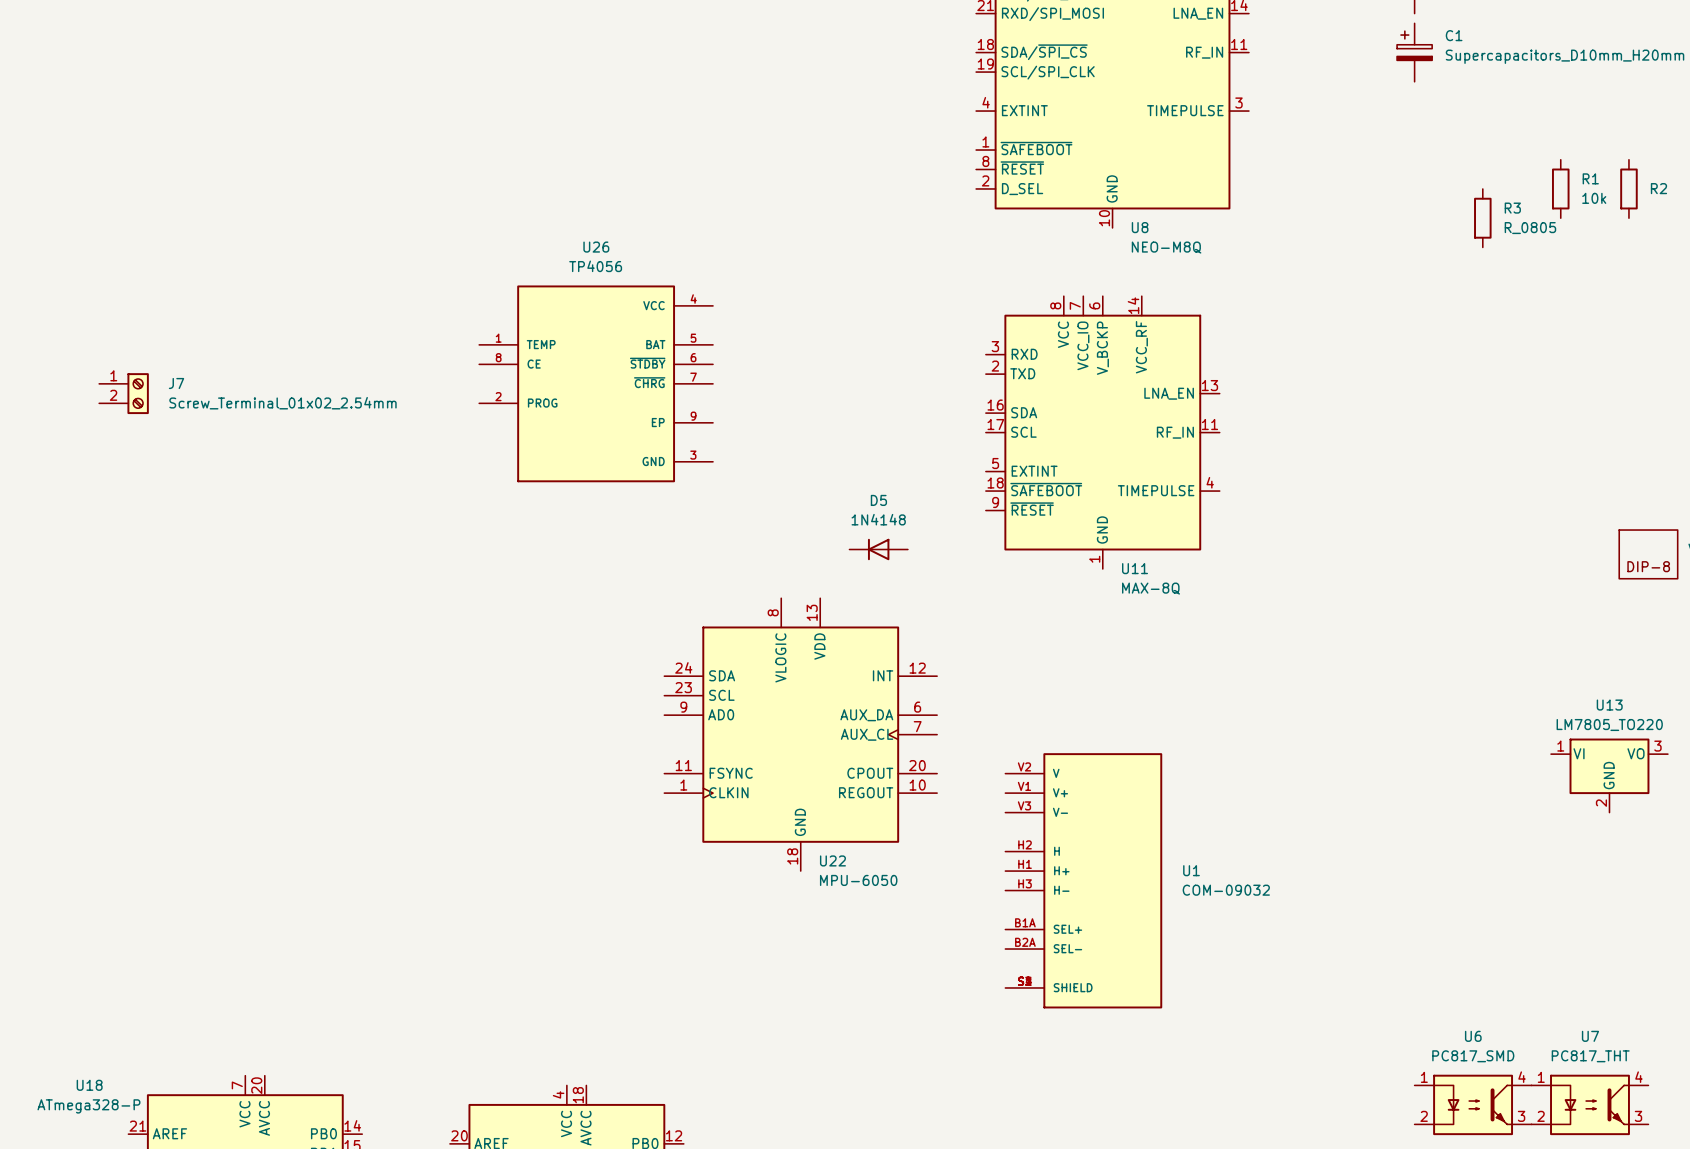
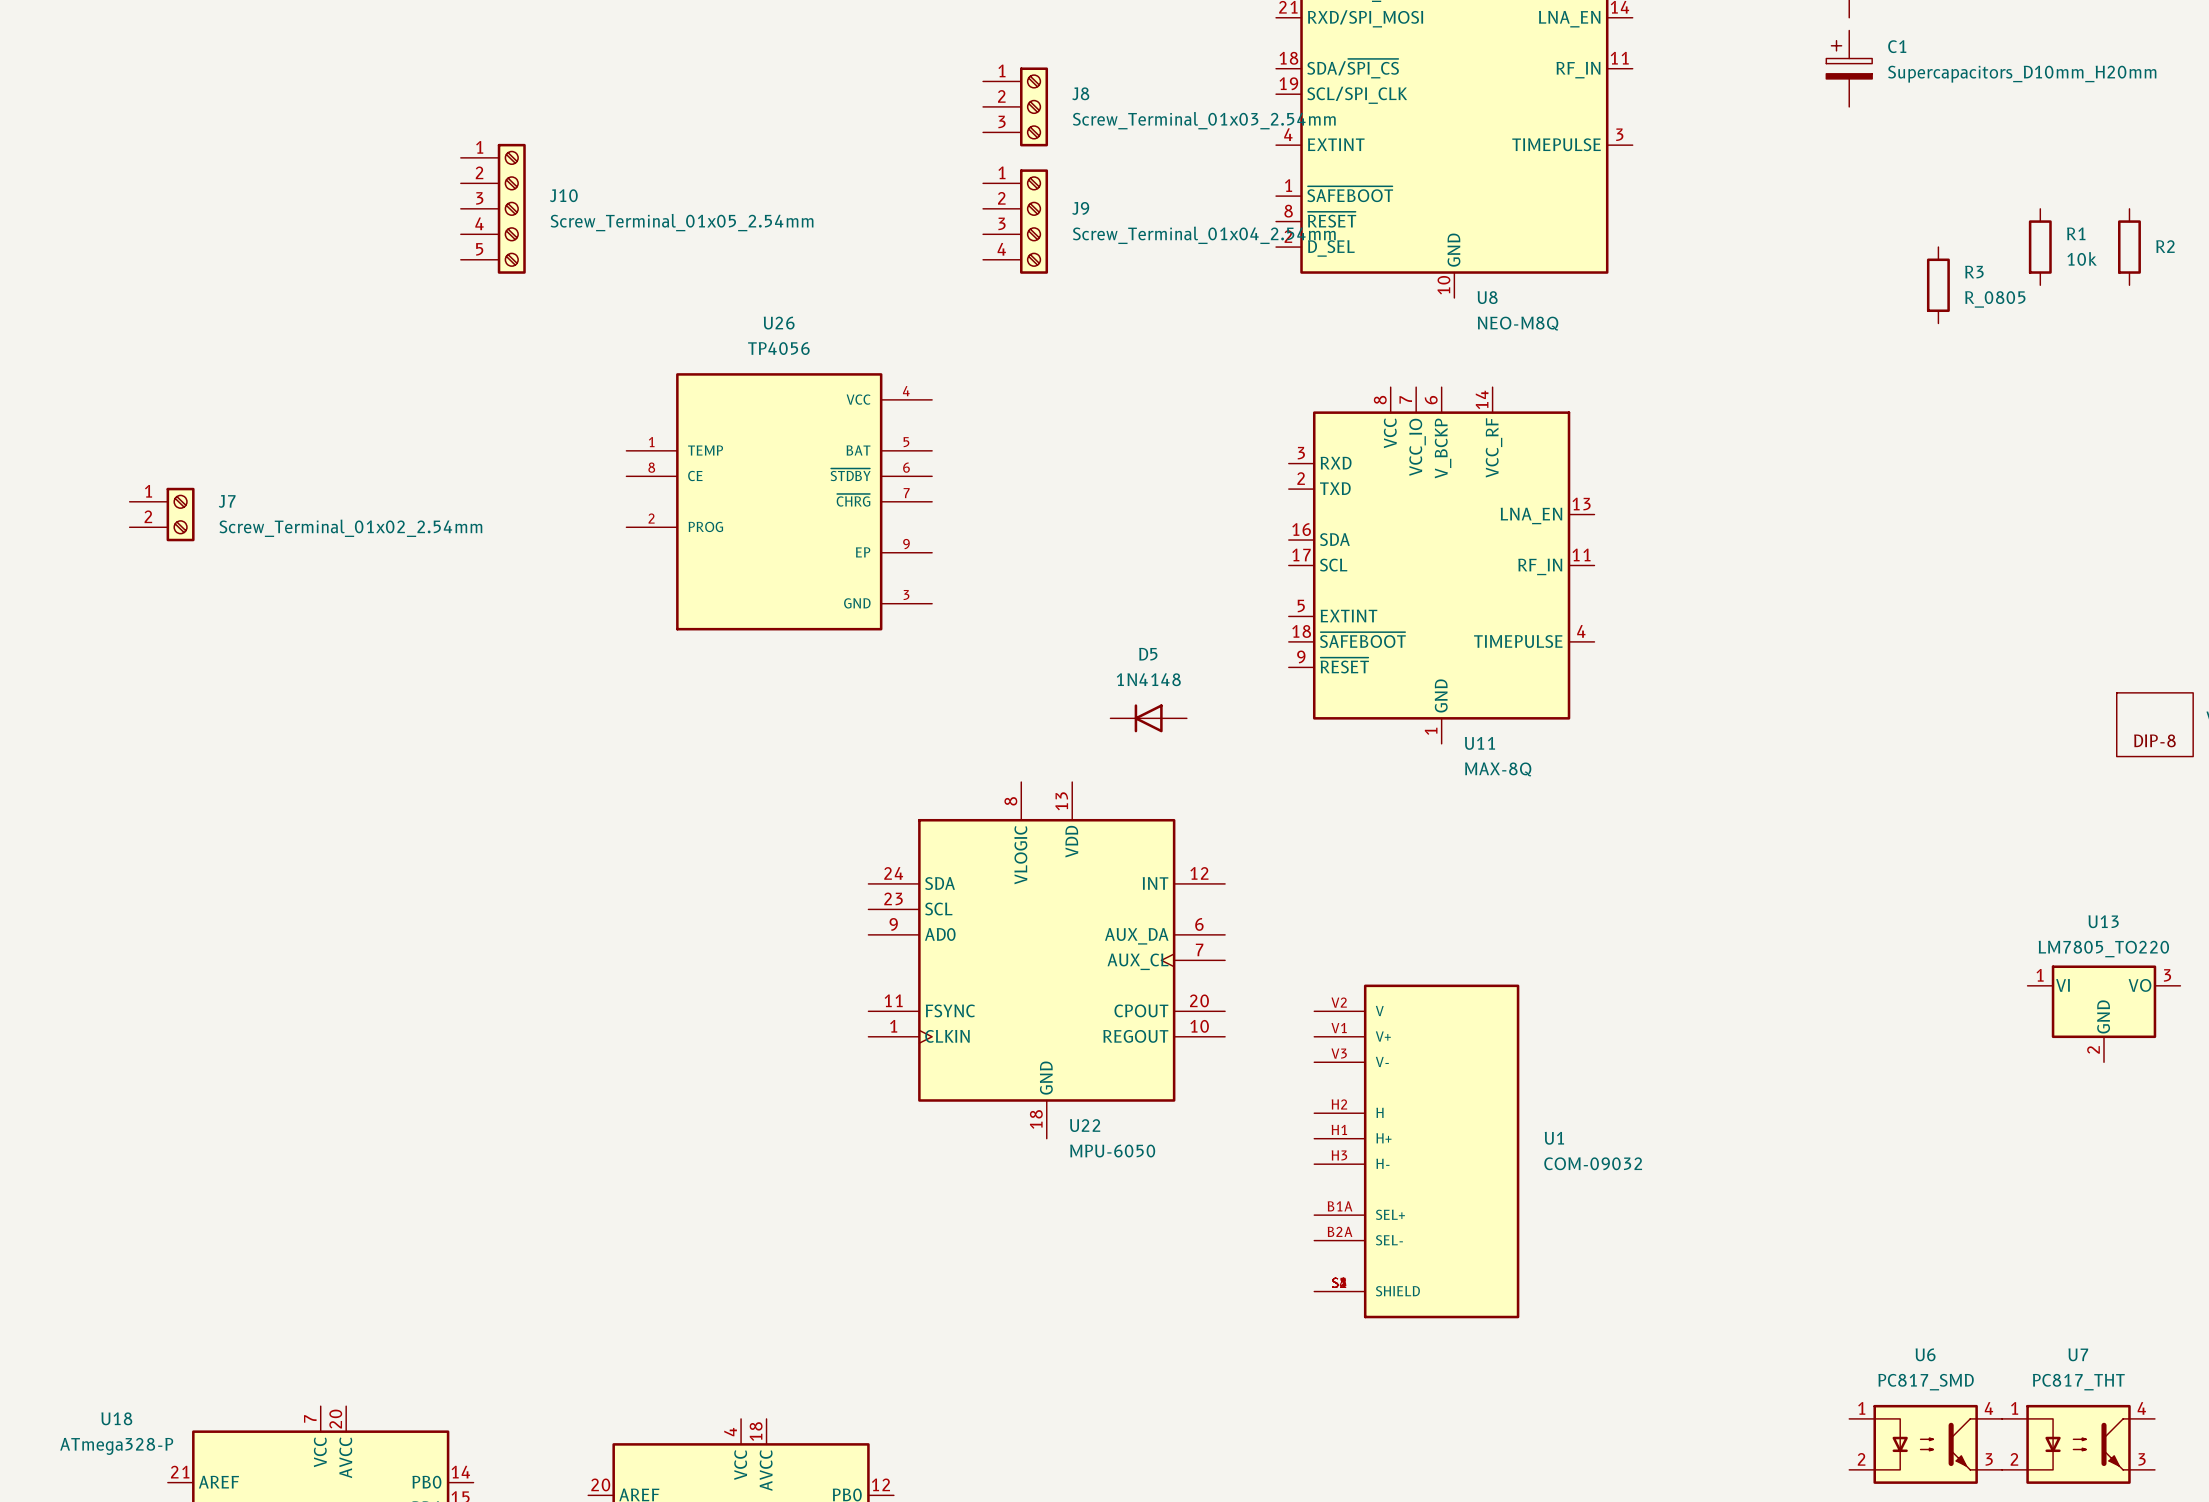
J8: none -> Screw_Terminal_01x03_2.54mm (1015, 106)
J10: none -> Screw_Terminal_01x05_2.54mm (493, 208)
J9: none -> Screw_Terminal_01x04_2.54mm (1015, 221)

